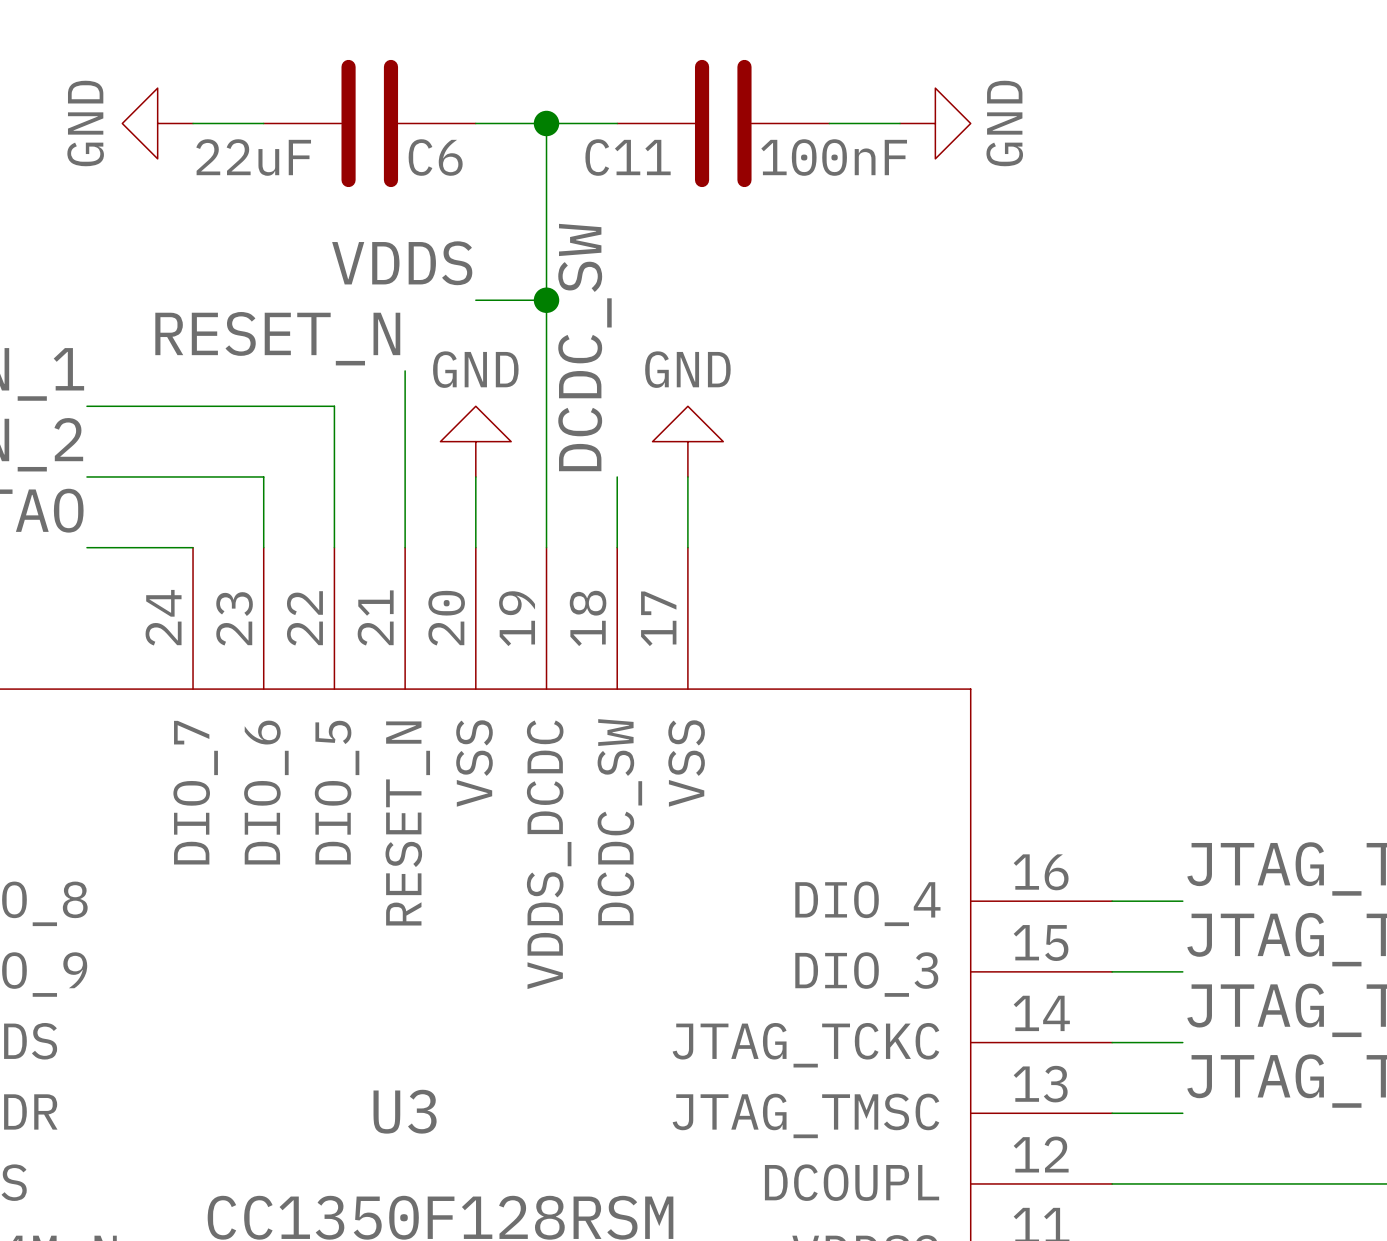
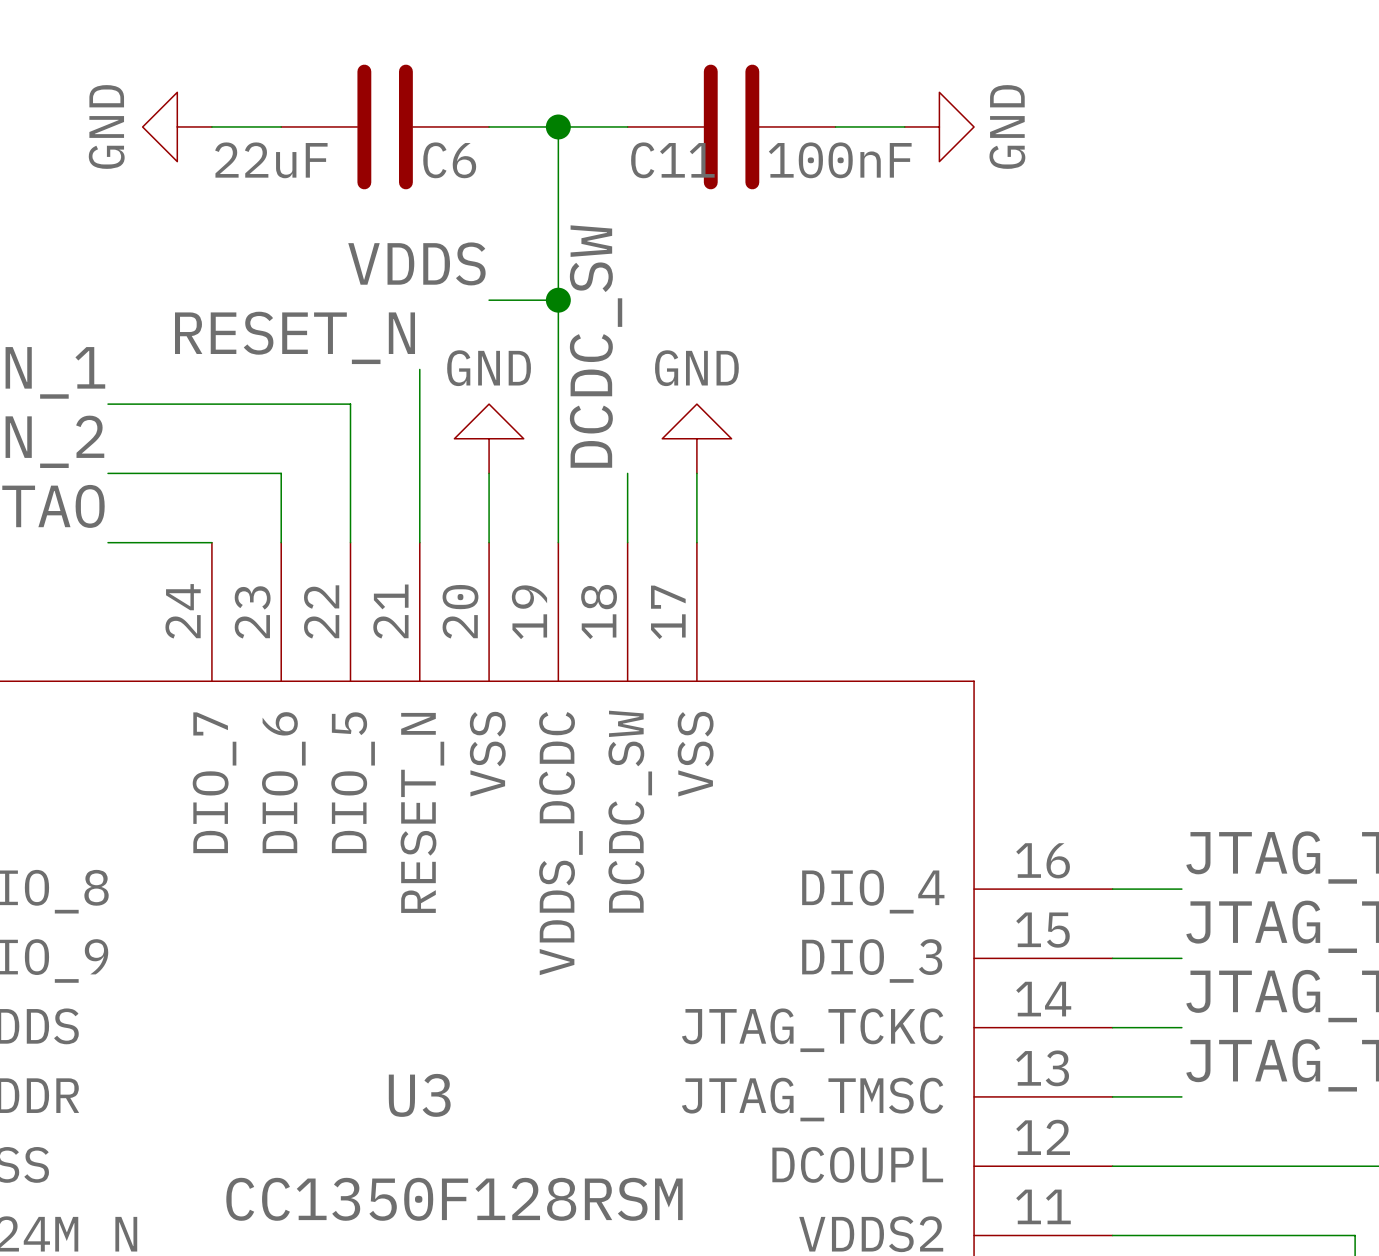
C11 name position: C11 (628, 157) -> C11 (672, 160)

